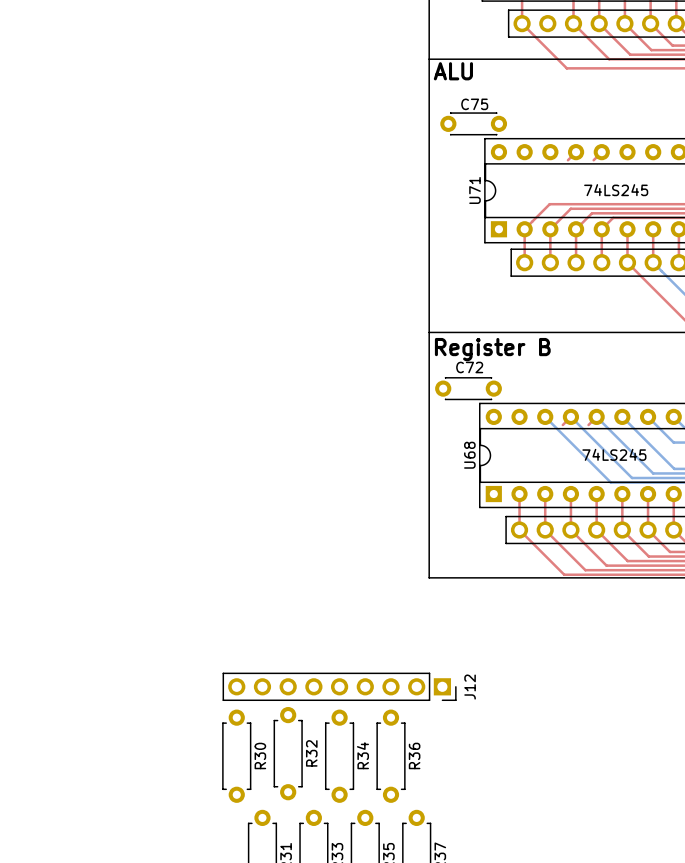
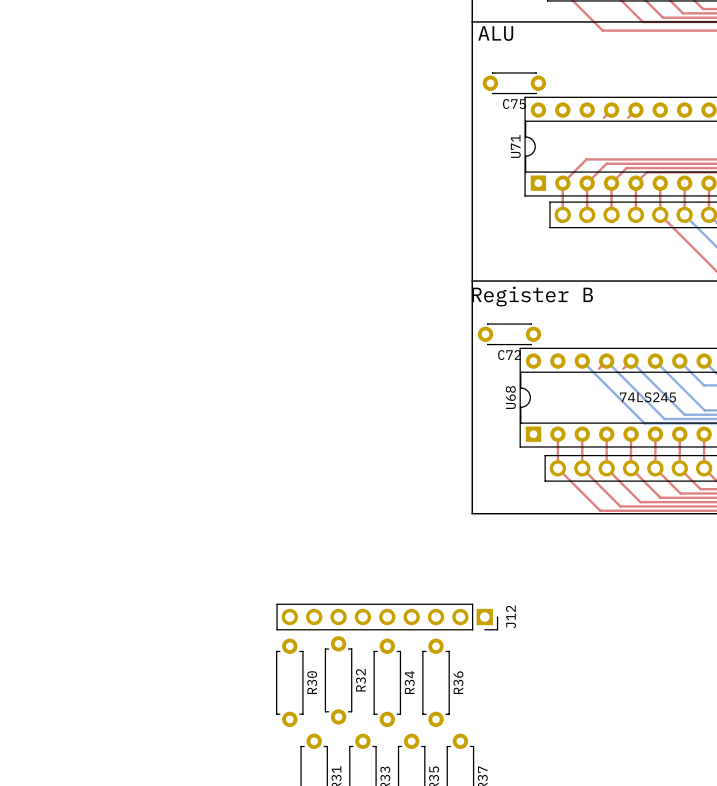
C75 name position: C75 (474, 104) -> C75 (514, 104)
text: 74LS245 (616, 190) -> none
C72 name position: C72 (469, 367) -> C72 (509, 355)

